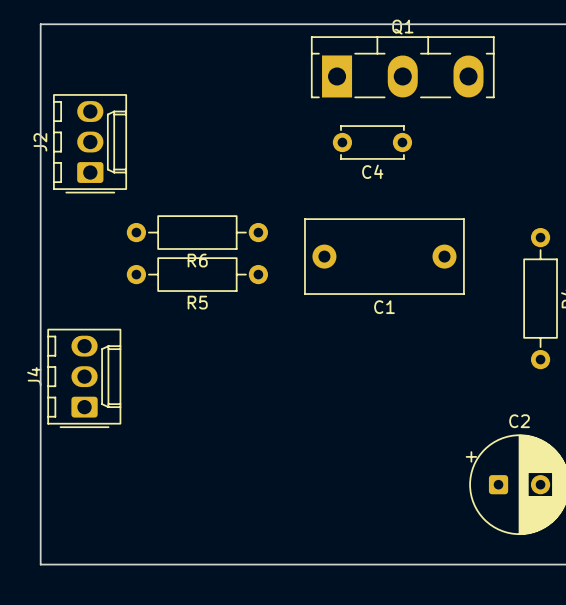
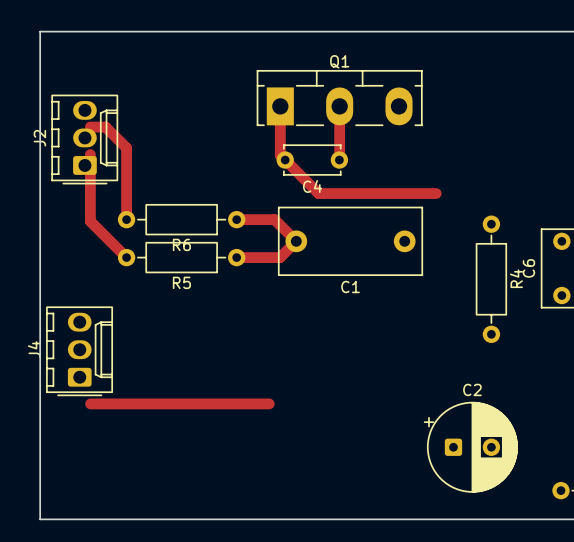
Q1 position: (402, 67) -> (339, 98)
track: none -> (339, 106) (339, 160)
track: none -> (285, 111) (280, 106) (280, 155) (318, 193) (436, 193)
track: none -> (90, 127) (105, 127) (126, 148) (126, 219)
C4 position: (372, 142) -> (312, 160)
track: none -> (90, 154) (90, 221) (126, 257)
track: none -> (236, 219) (274, 219) (296, 241) (280, 257) (236, 257)
track: none -> (90, 403) (269, 403)

